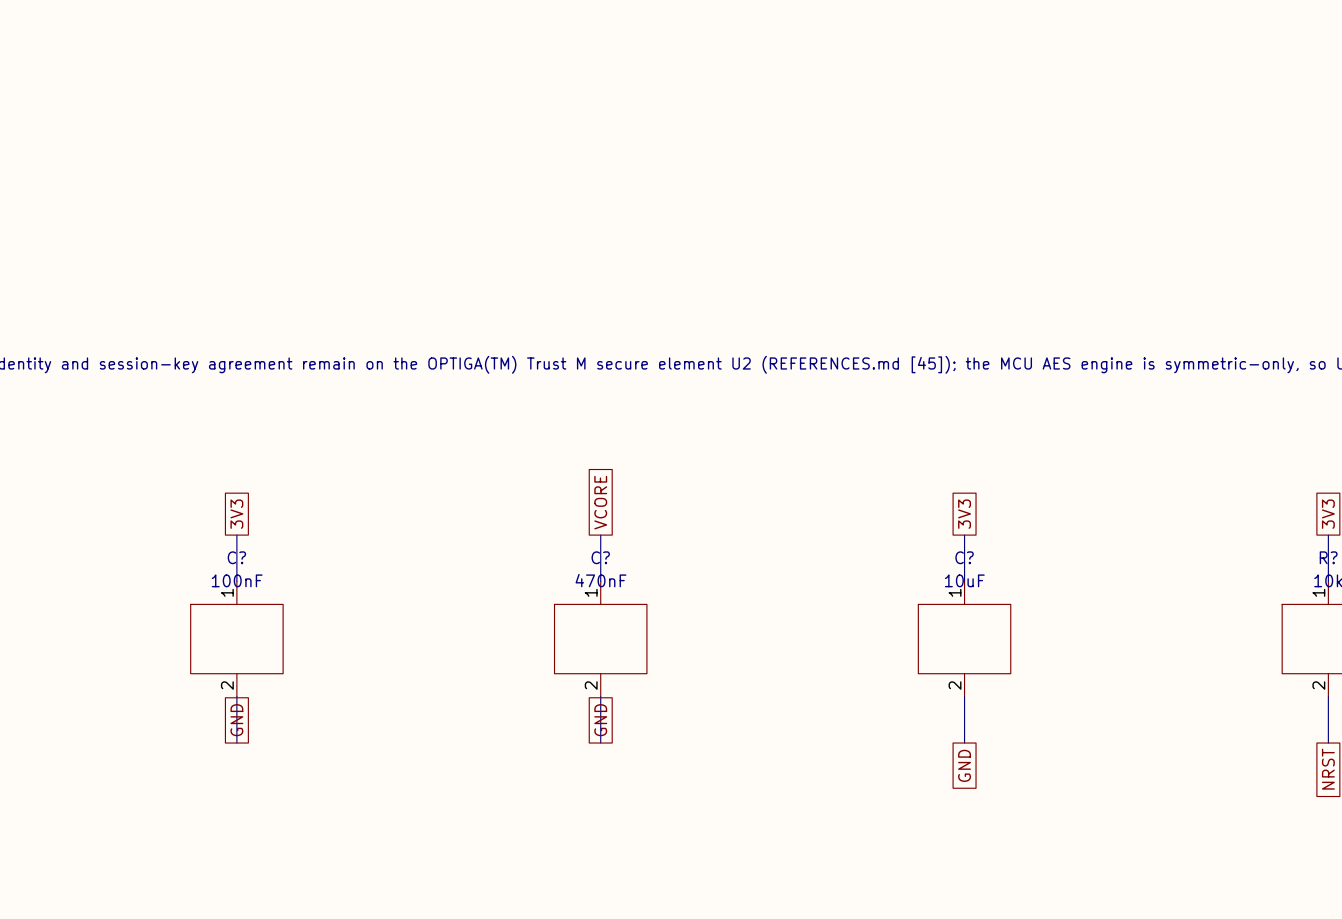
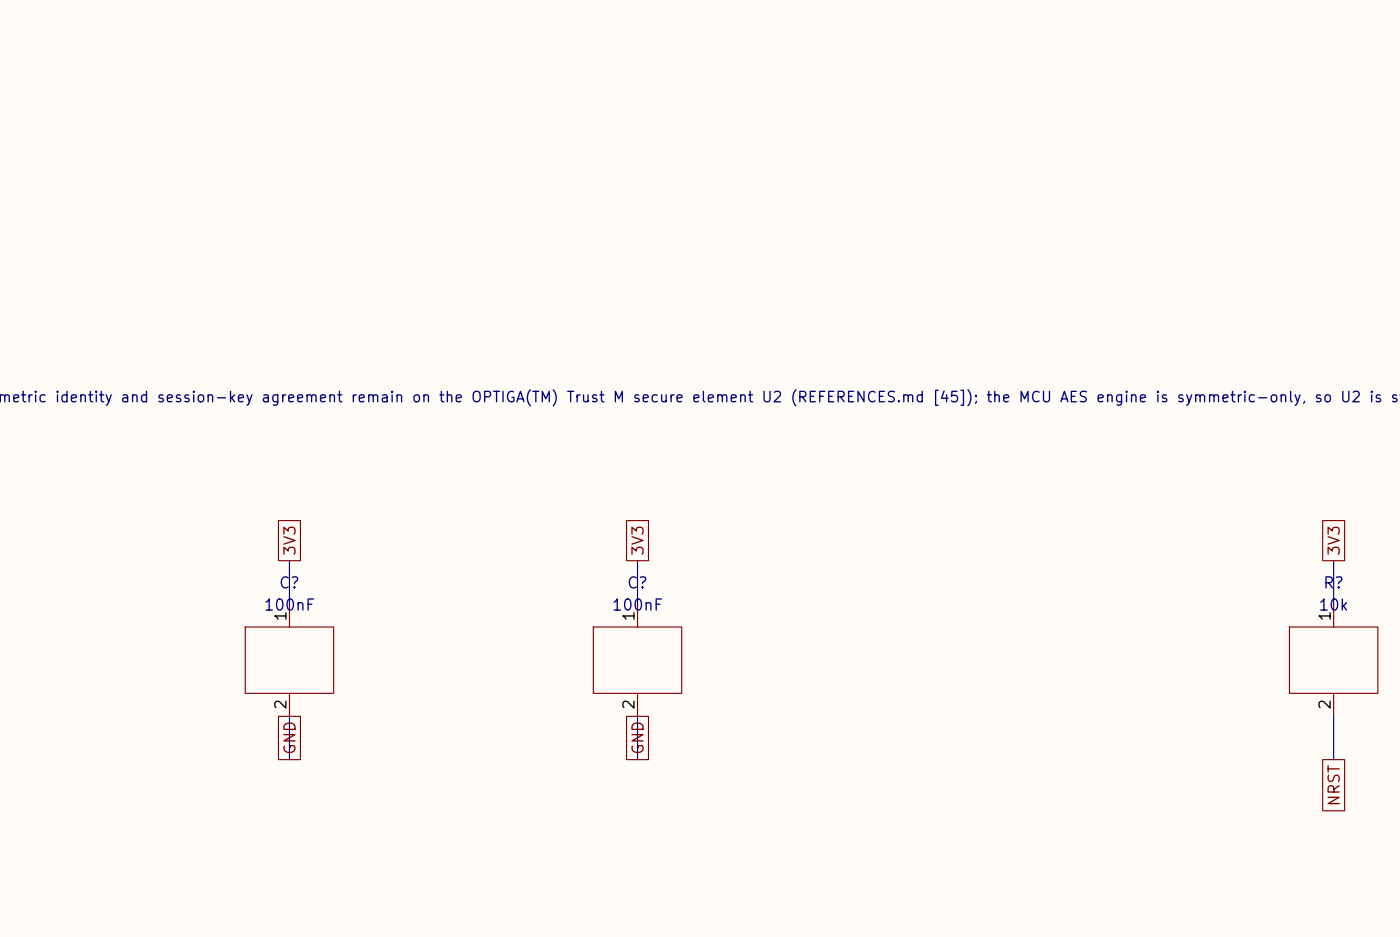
global label: VCORE (600, 502) -> 3V3 (637, 540)
global label: 3V3 (964, 514) -> none
wire: (964, 535) (964, 581) -> none
C? value: 470nF (601, 580) -> 100nF (637, 604)
C?: 10uF (964, 639) -> none
wire: (964, 696) (964, 743) -> none
global label: GND (964, 765) -> none

